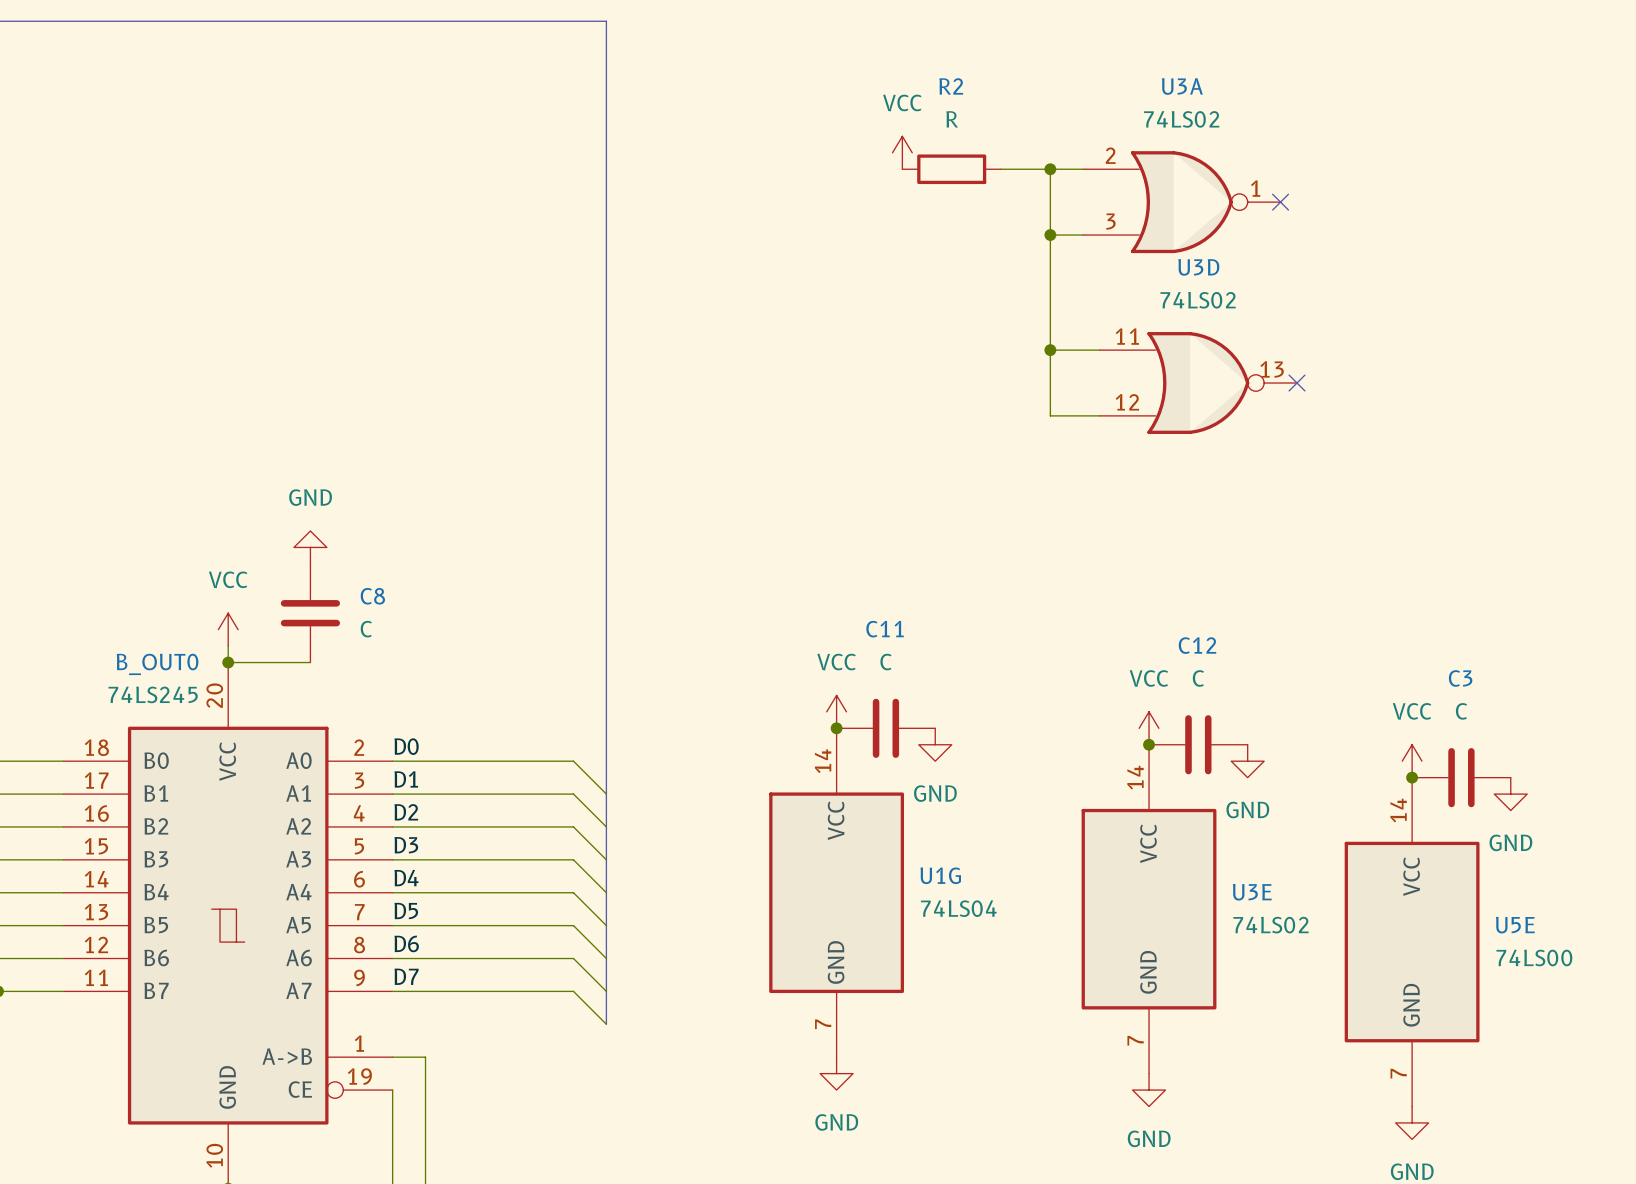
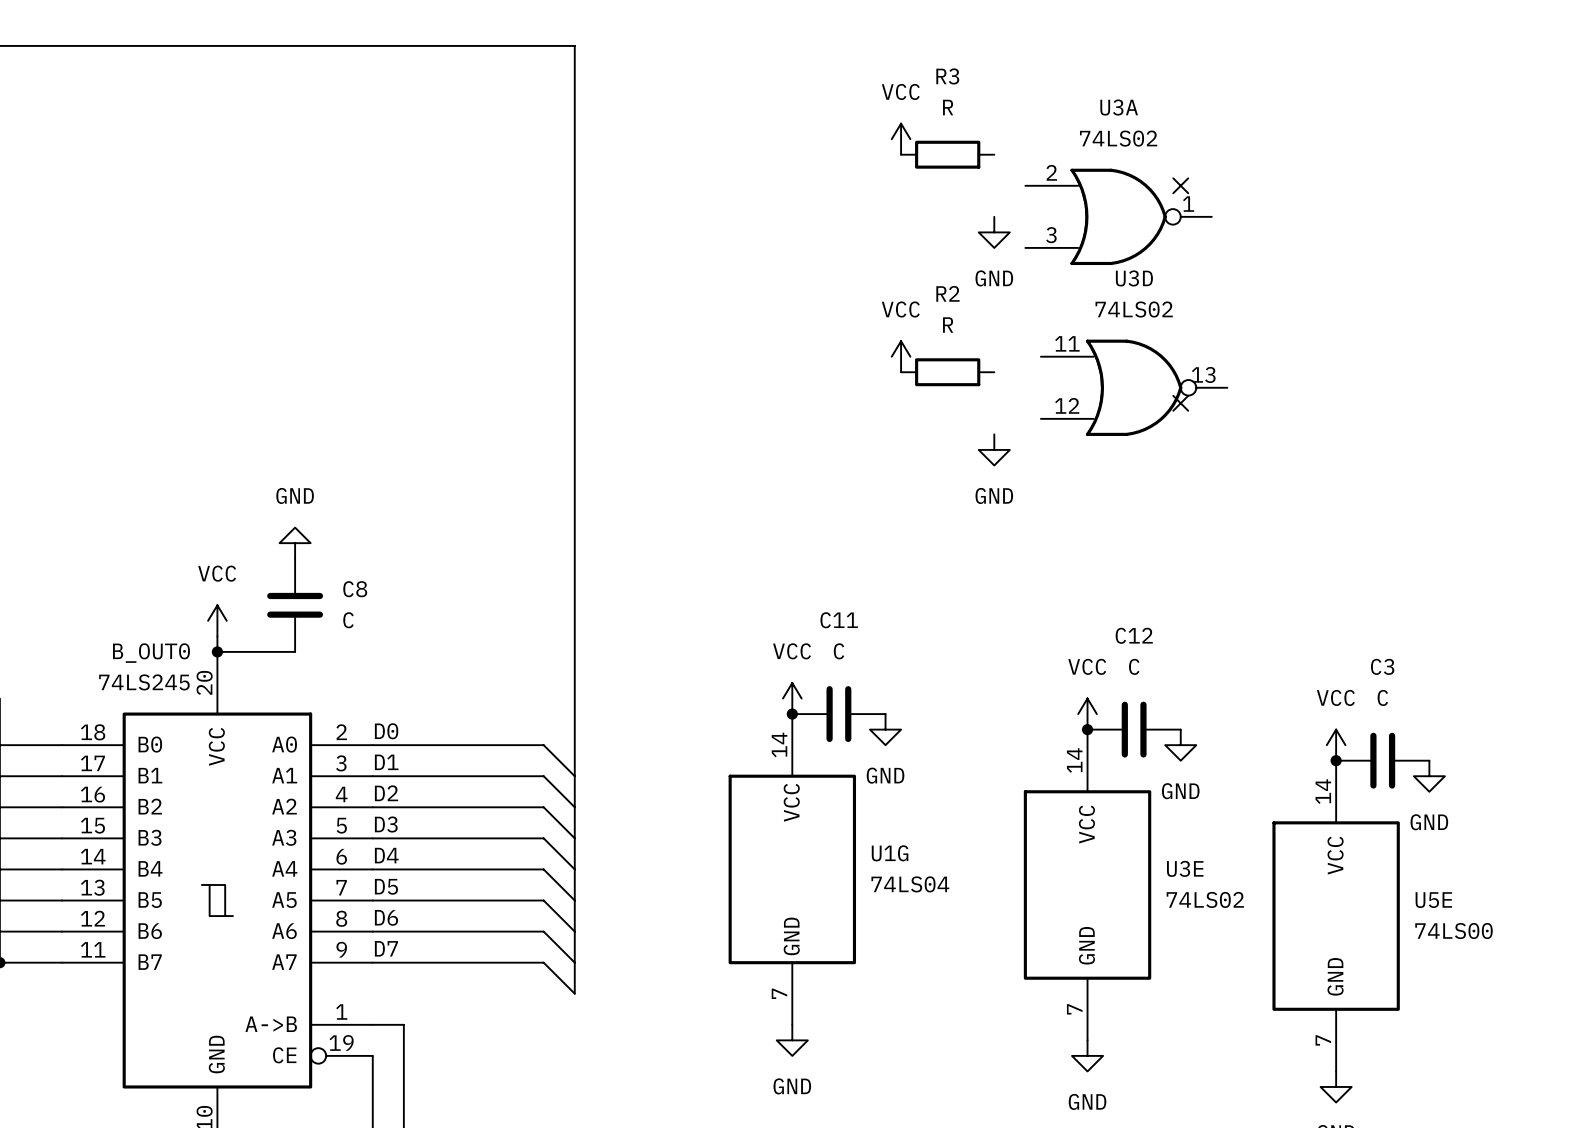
R3: none -> R (947, 154)
power symbol position: VCC (902, 152) -> VCC (901, 139)
R2 position: (951, 169) -> (947, 372)
wire: (1001, 169) (1083, 169) -> none
wire: (1050, 169) (1050, 415) (1099, 415) -> none
junction: (1050, 169) -> none
no-connect mark position: (1280, 202) -> (1180, 185)
power symbol: none -> GND (994, 232)
wire: (1050, 235) (1083, 235) -> none
junction: (1050, 235) -> none
power symbol: none -> VCC (901, 356)
wire: (1050, 350) (1099, 350) -> none
junction: (1050, 350) -> none
no-connect mark position: (1297, 383) -> (1180, 403)
power symbol: none -> GND (994, 449)

